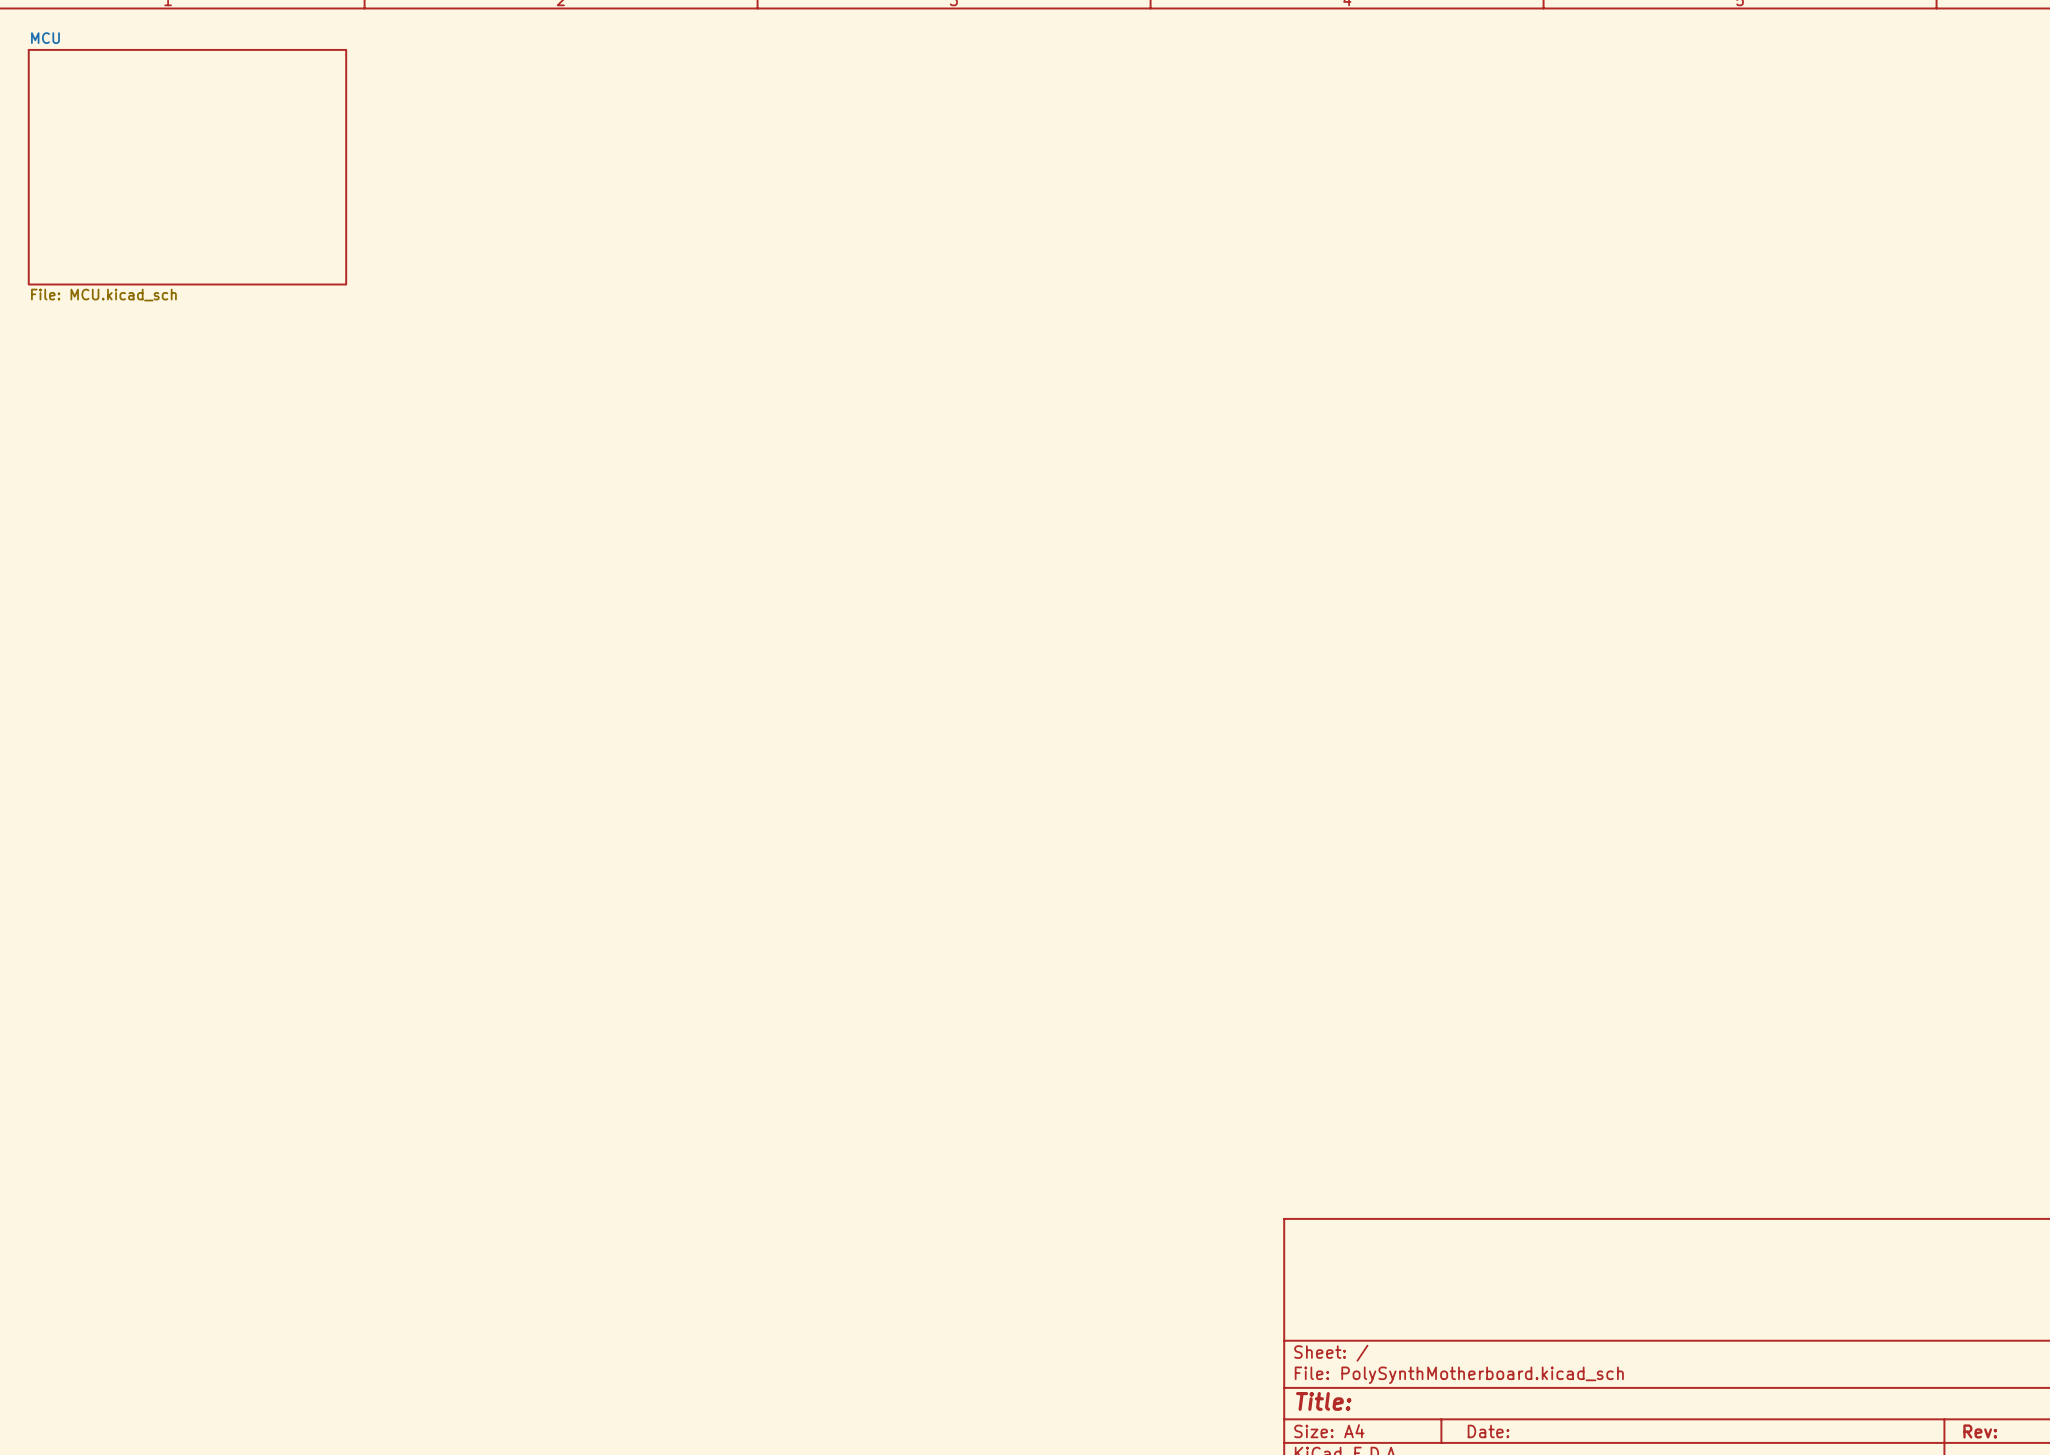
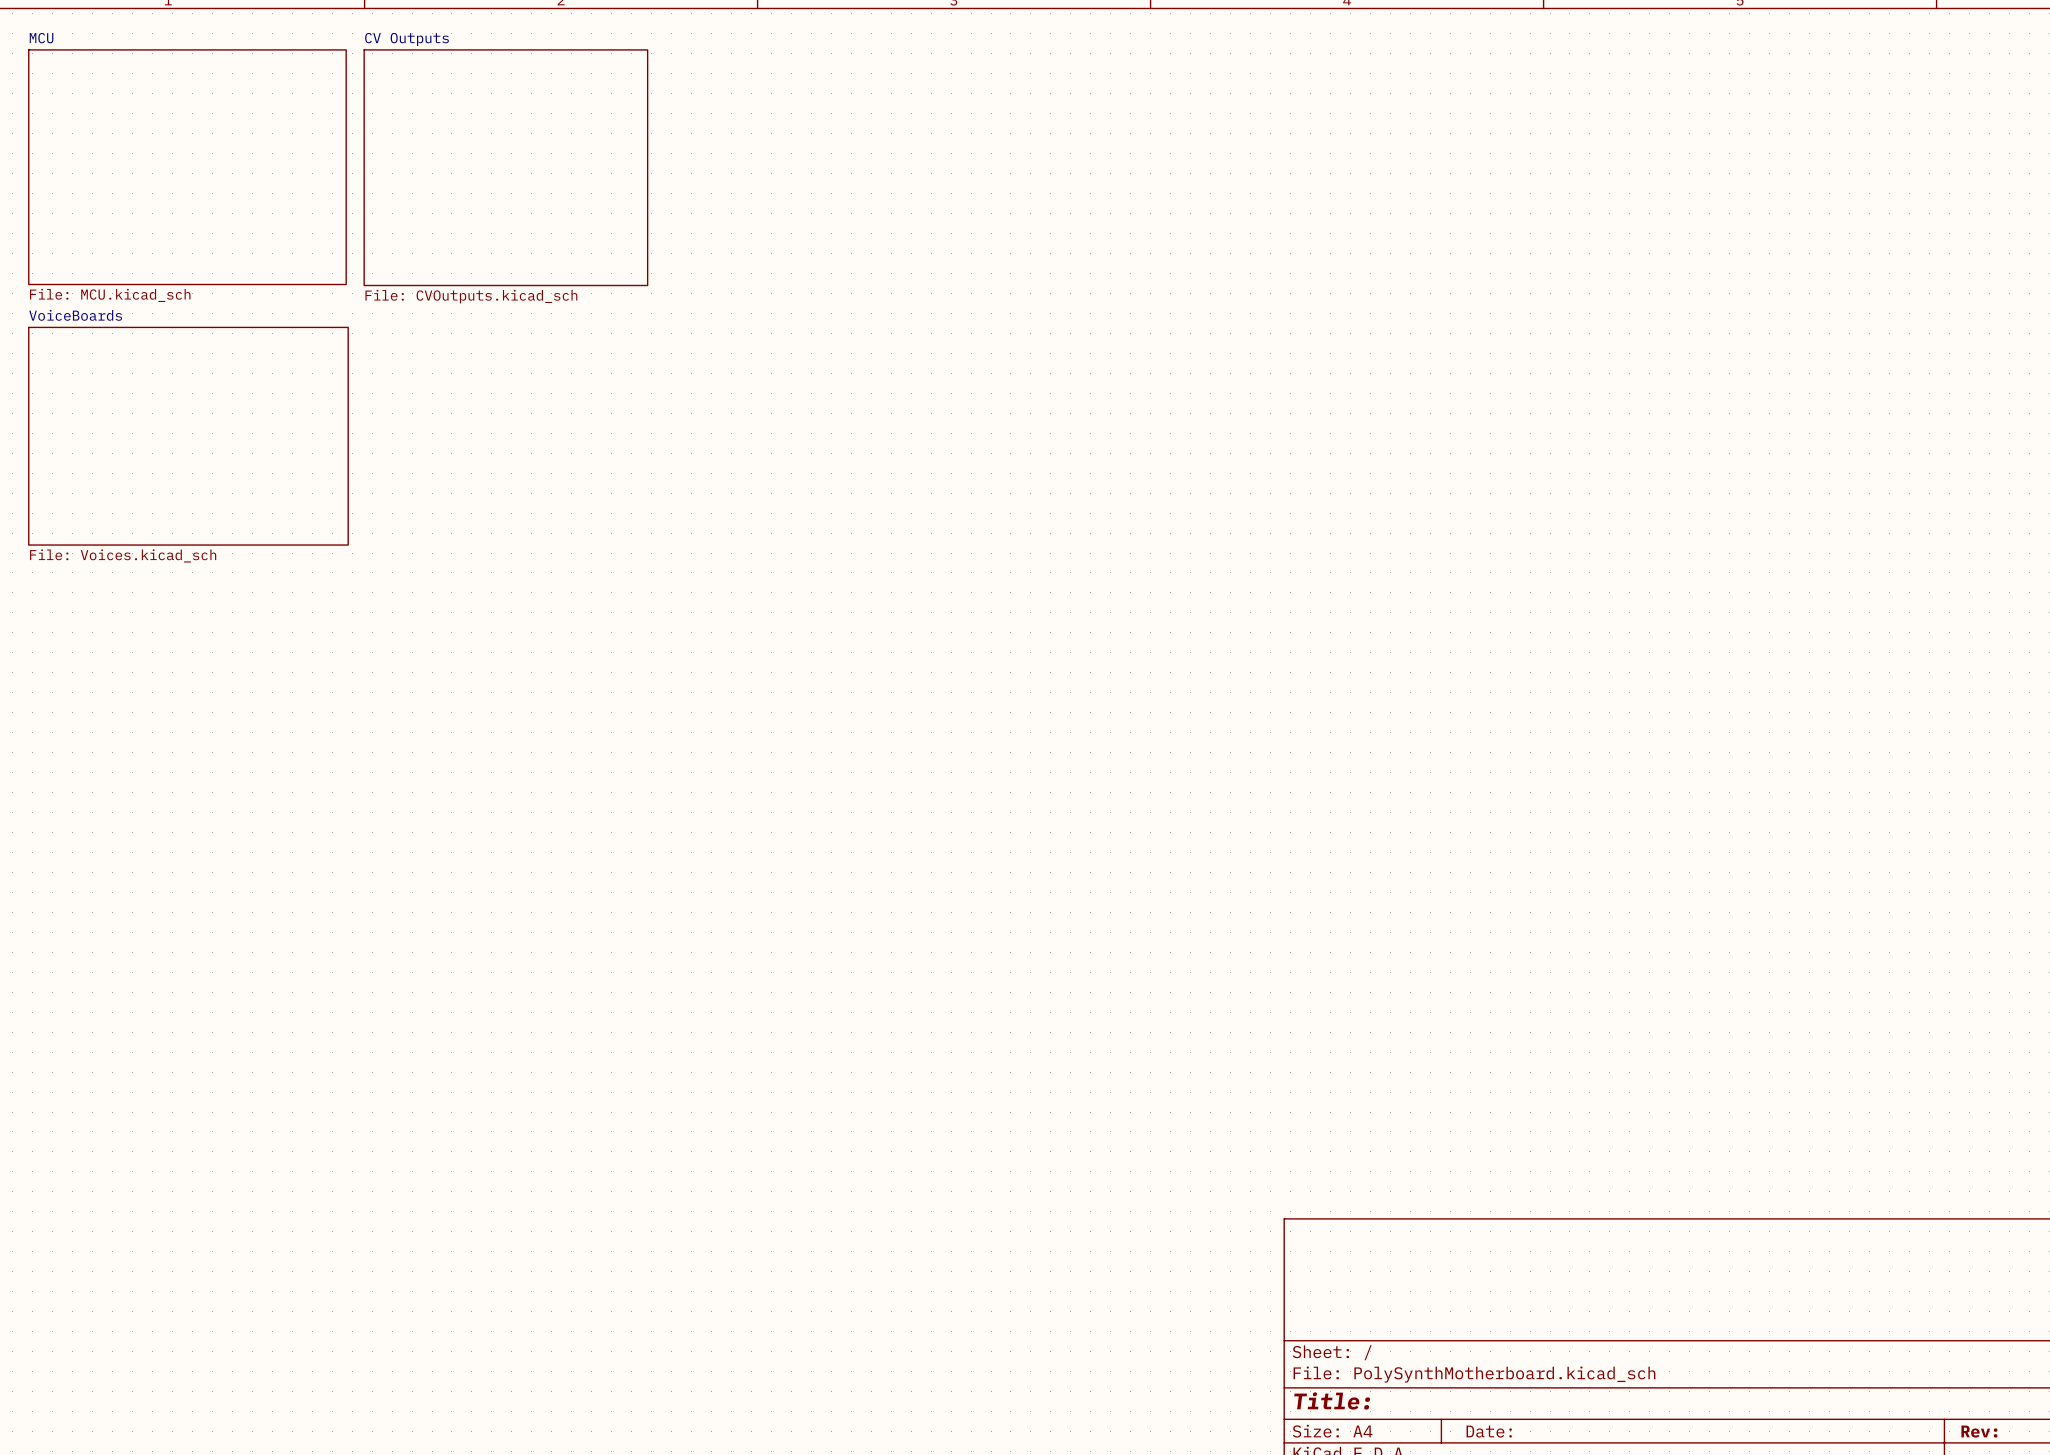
sheet CV Outputs: none -> File: CVOutputs.kicad_sch (505, 167)
sheet VoiceBoards: none -> File: Voices.kicad_sch (188, 436)

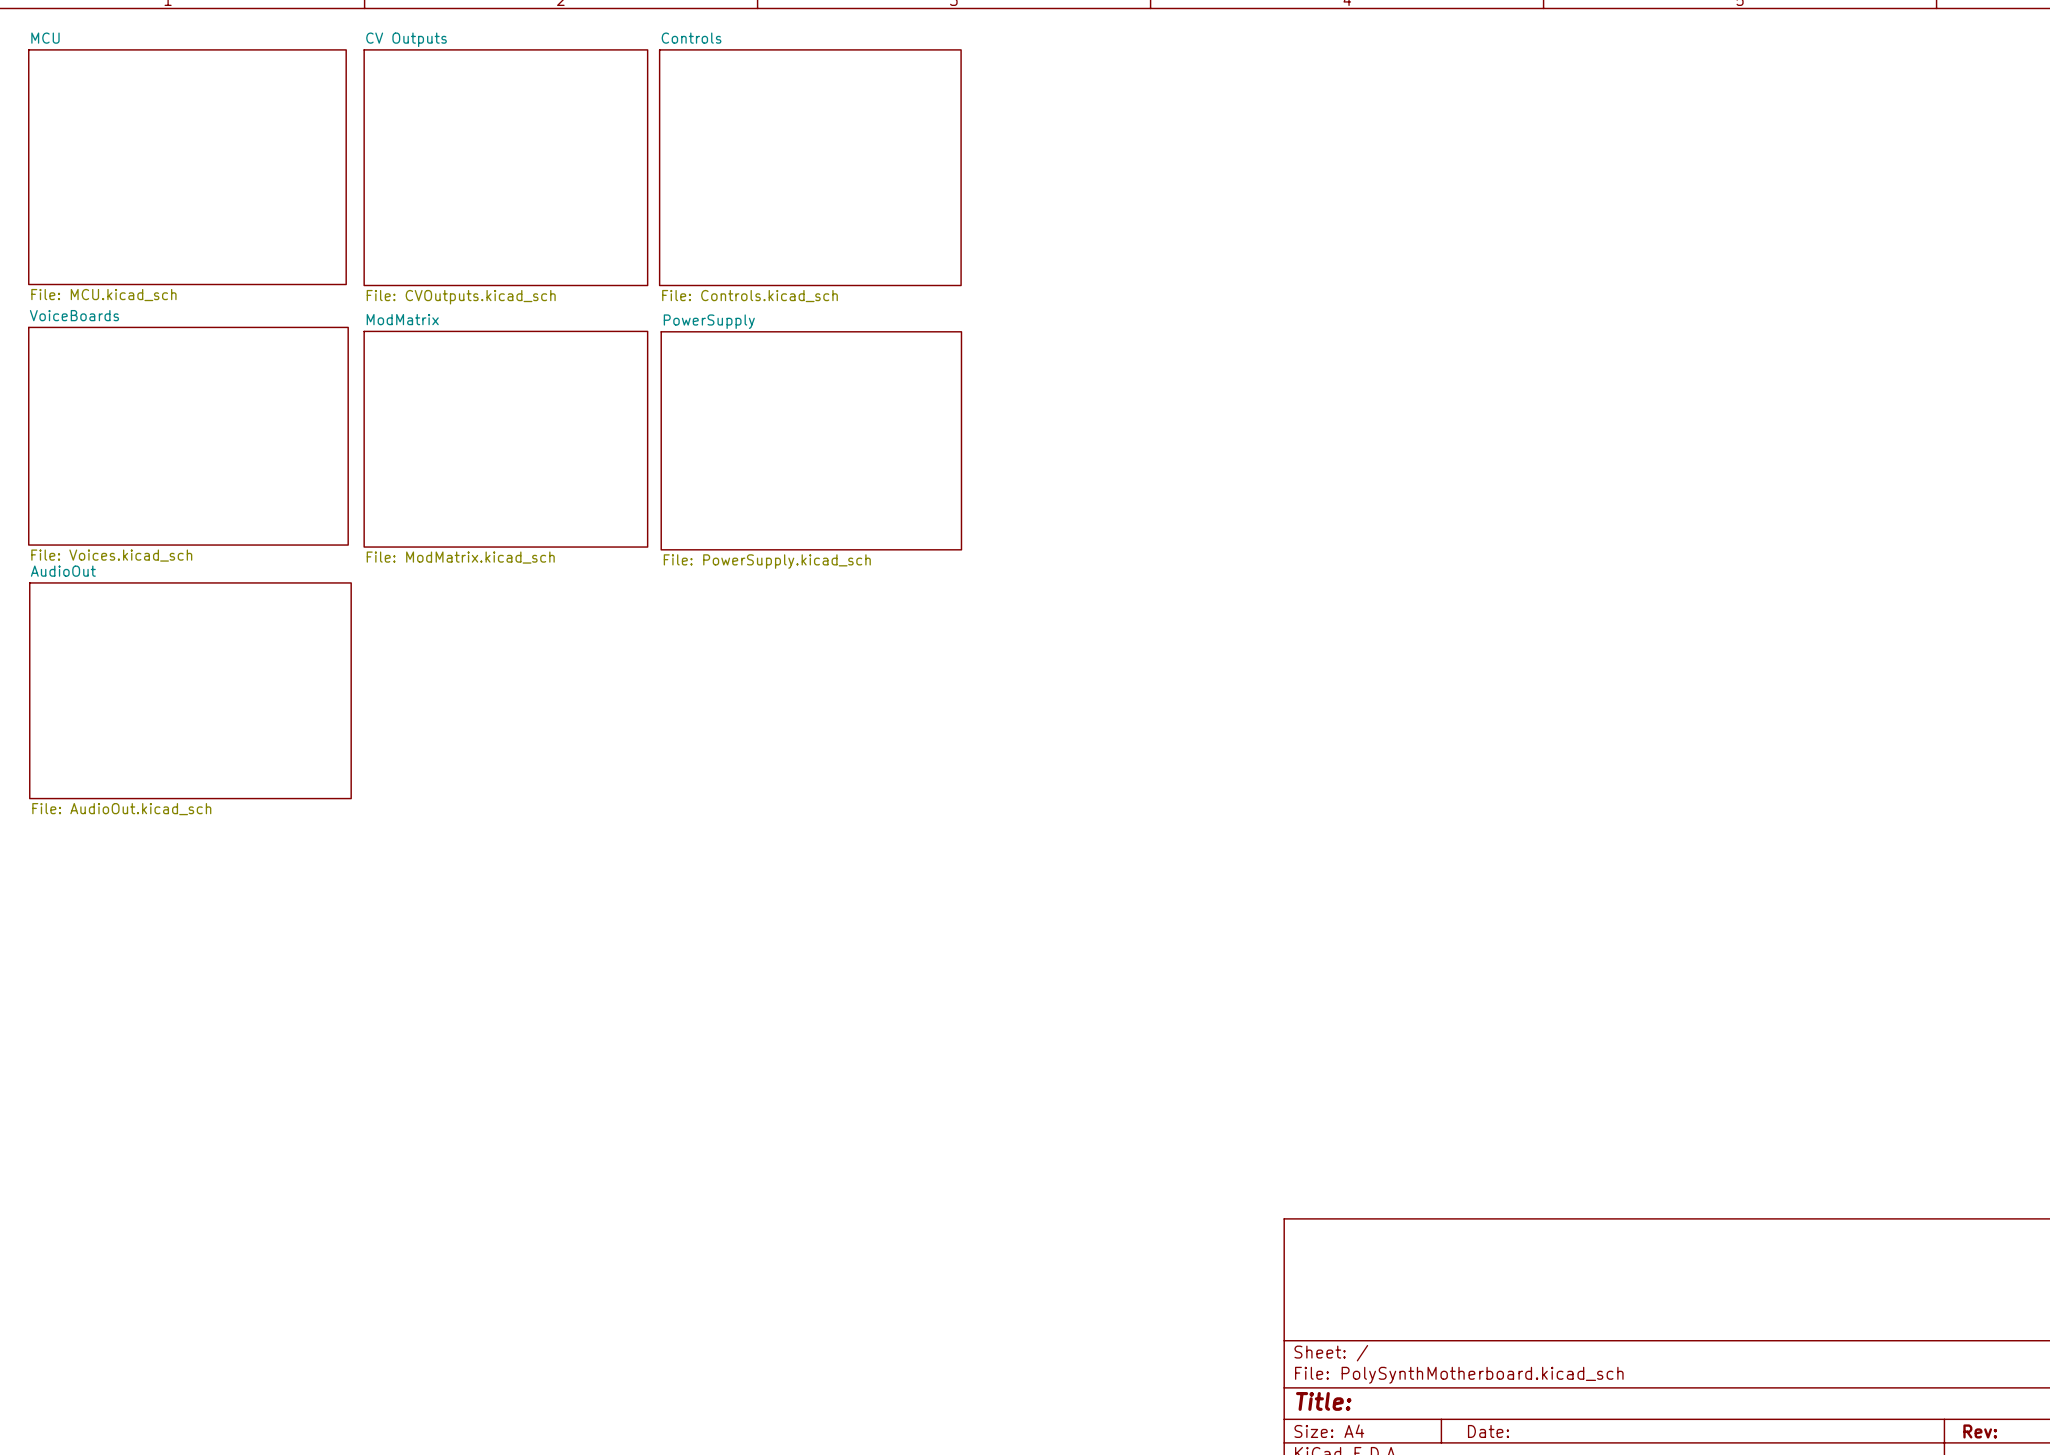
sheet Controls: none -> File: Controls.kicad_sch (810, 167)
sheet ModMatrix: none -> File: ModMatrix.kicad_sch (505, 439)
sheet PowerSupply: none -> File: PowerSupply.kicad_sch (811, 440)
sheet AudioOut: none -> File: AudioOut.kicad_sch (190, 690)

